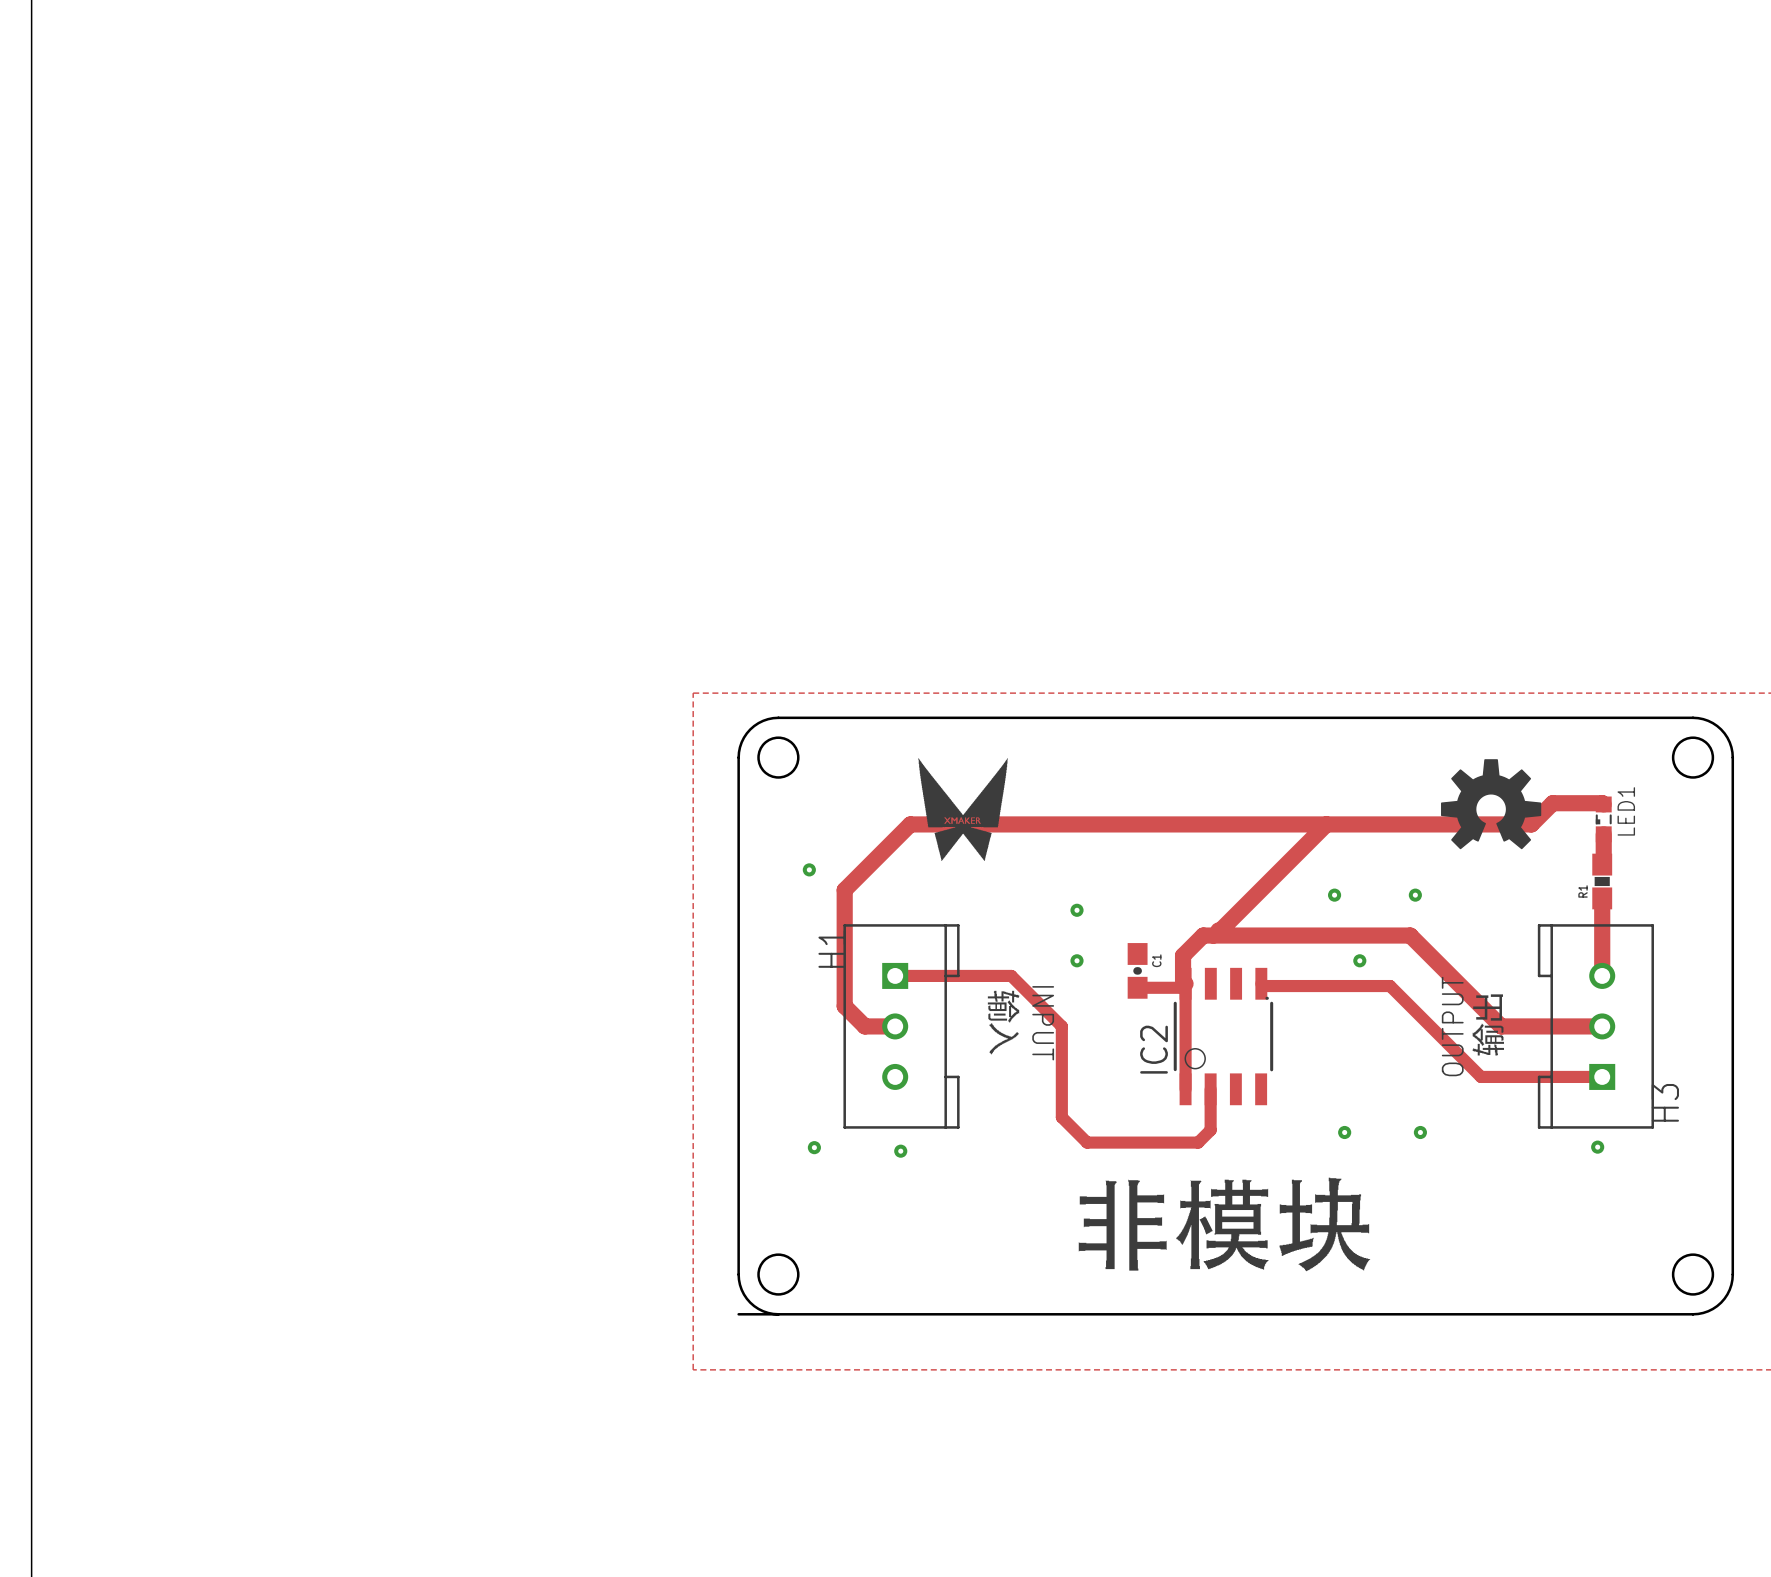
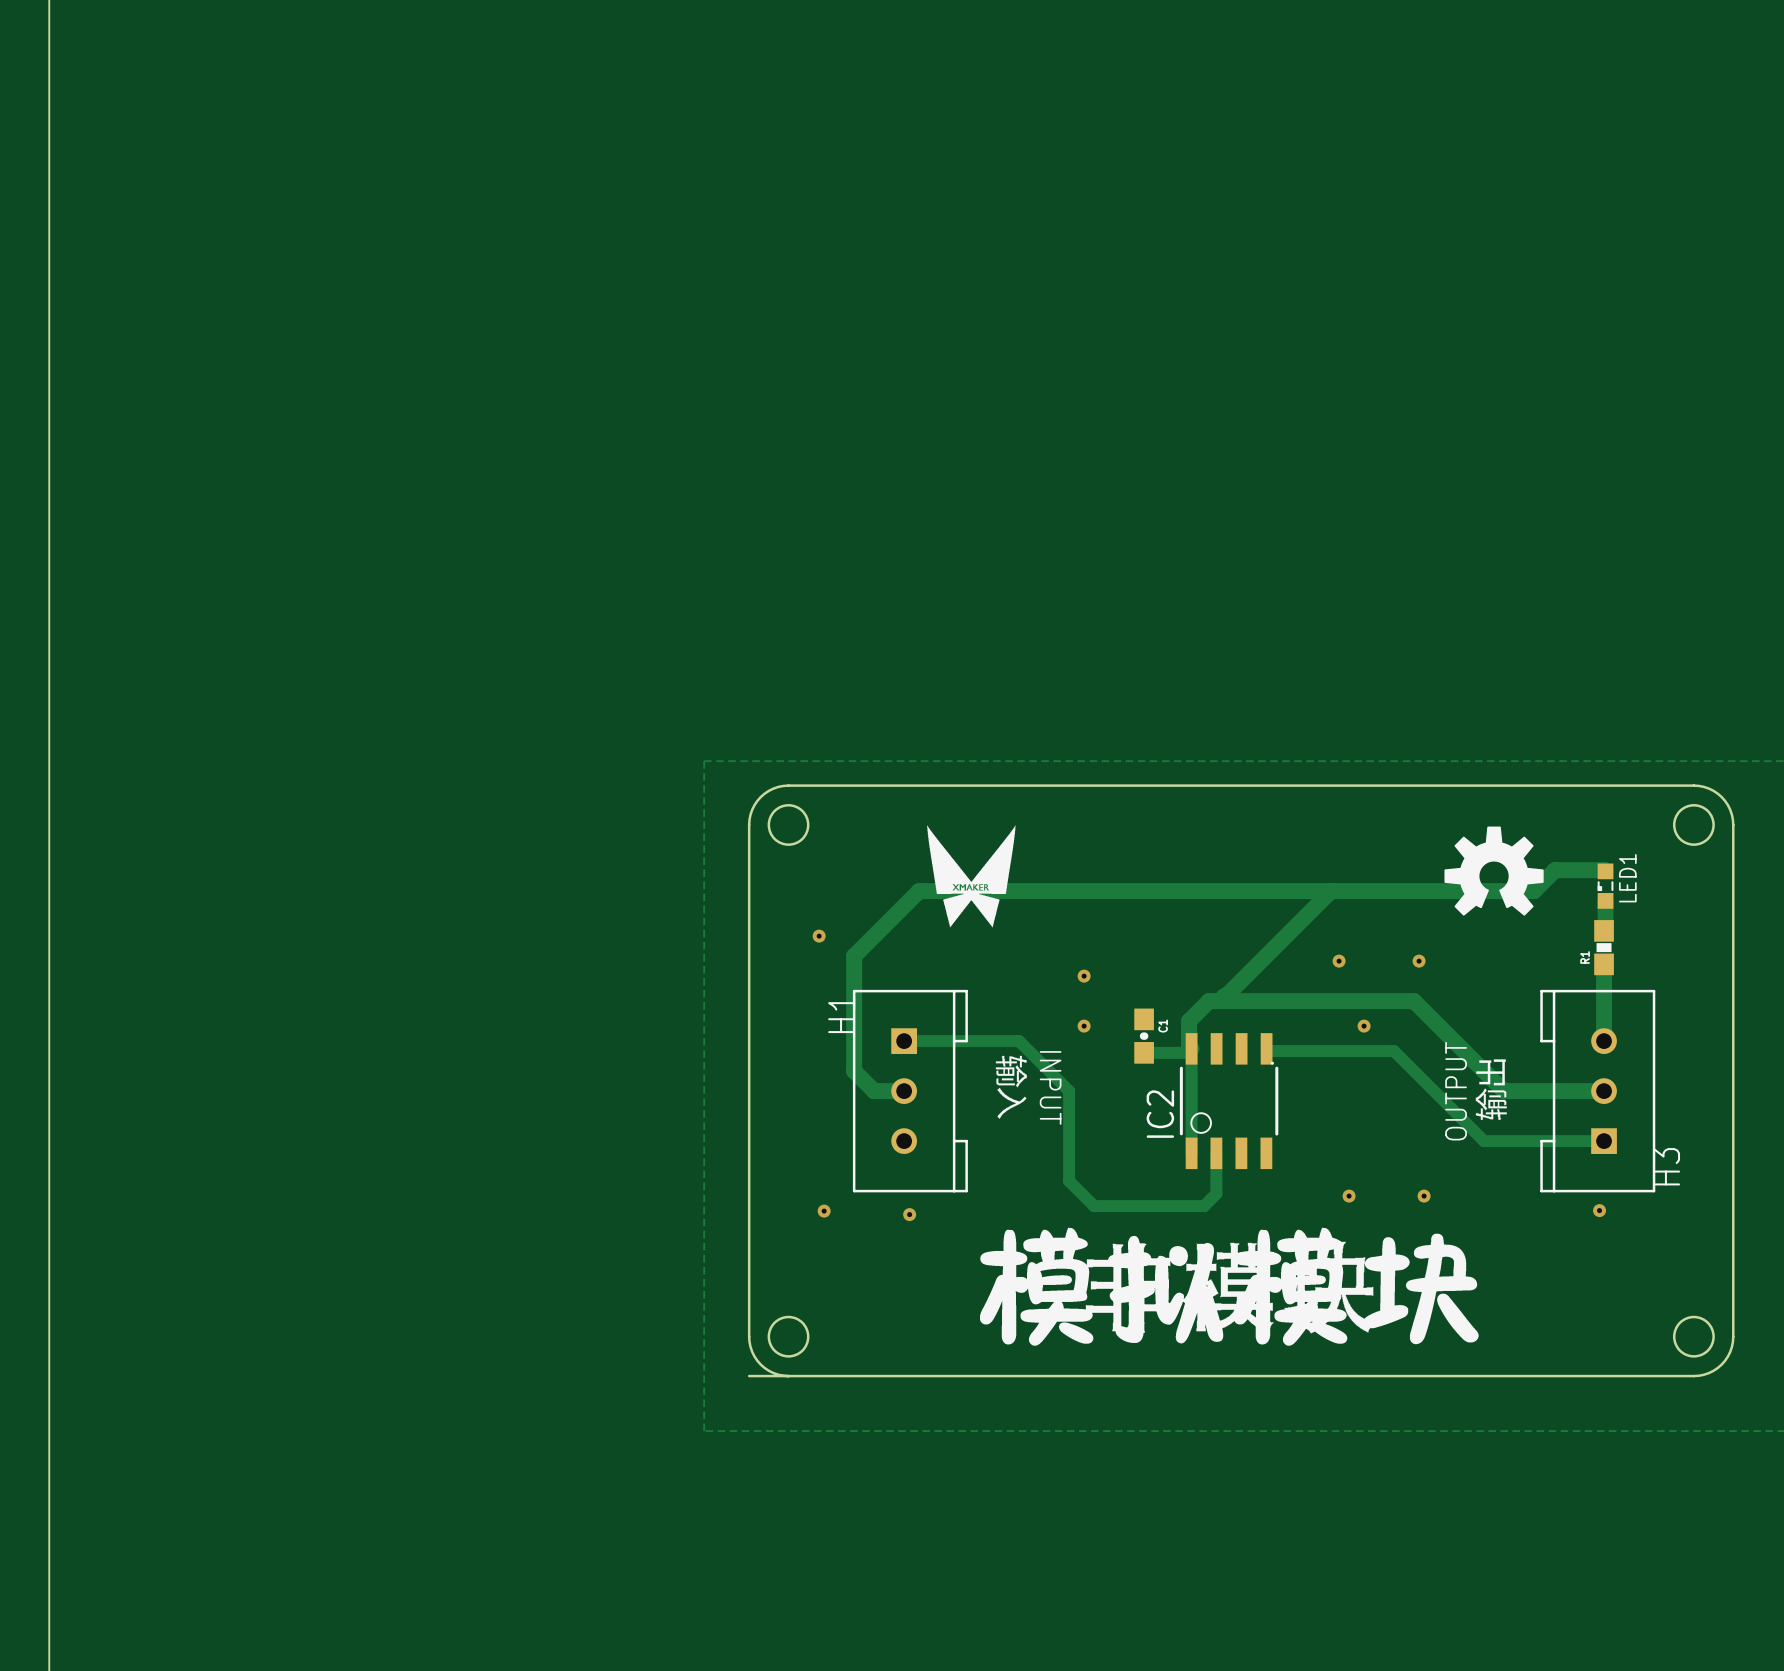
drawing: none -> [980, 1227, 1479, 1346]

